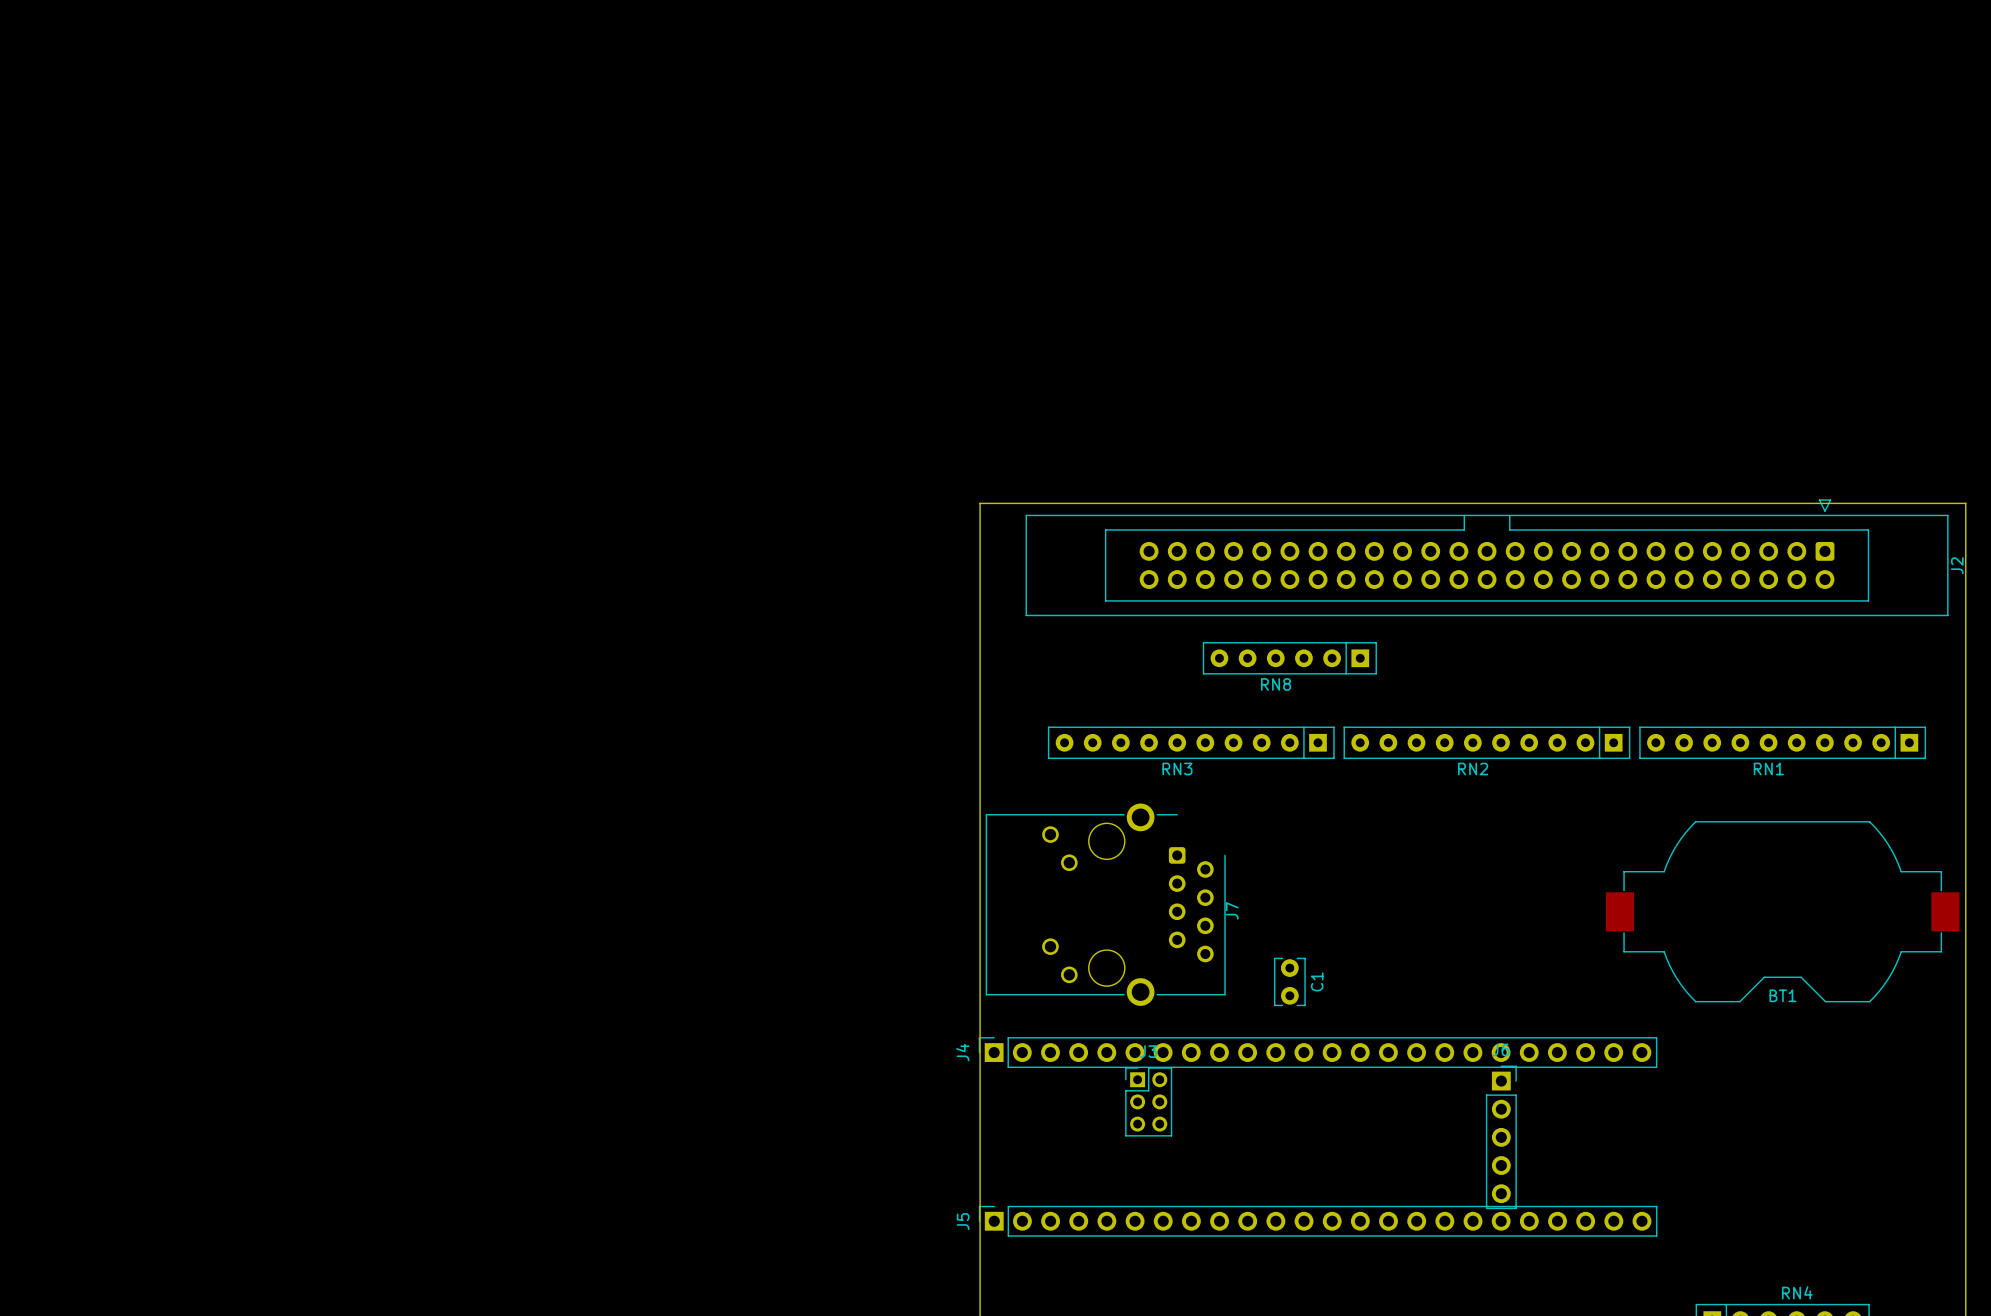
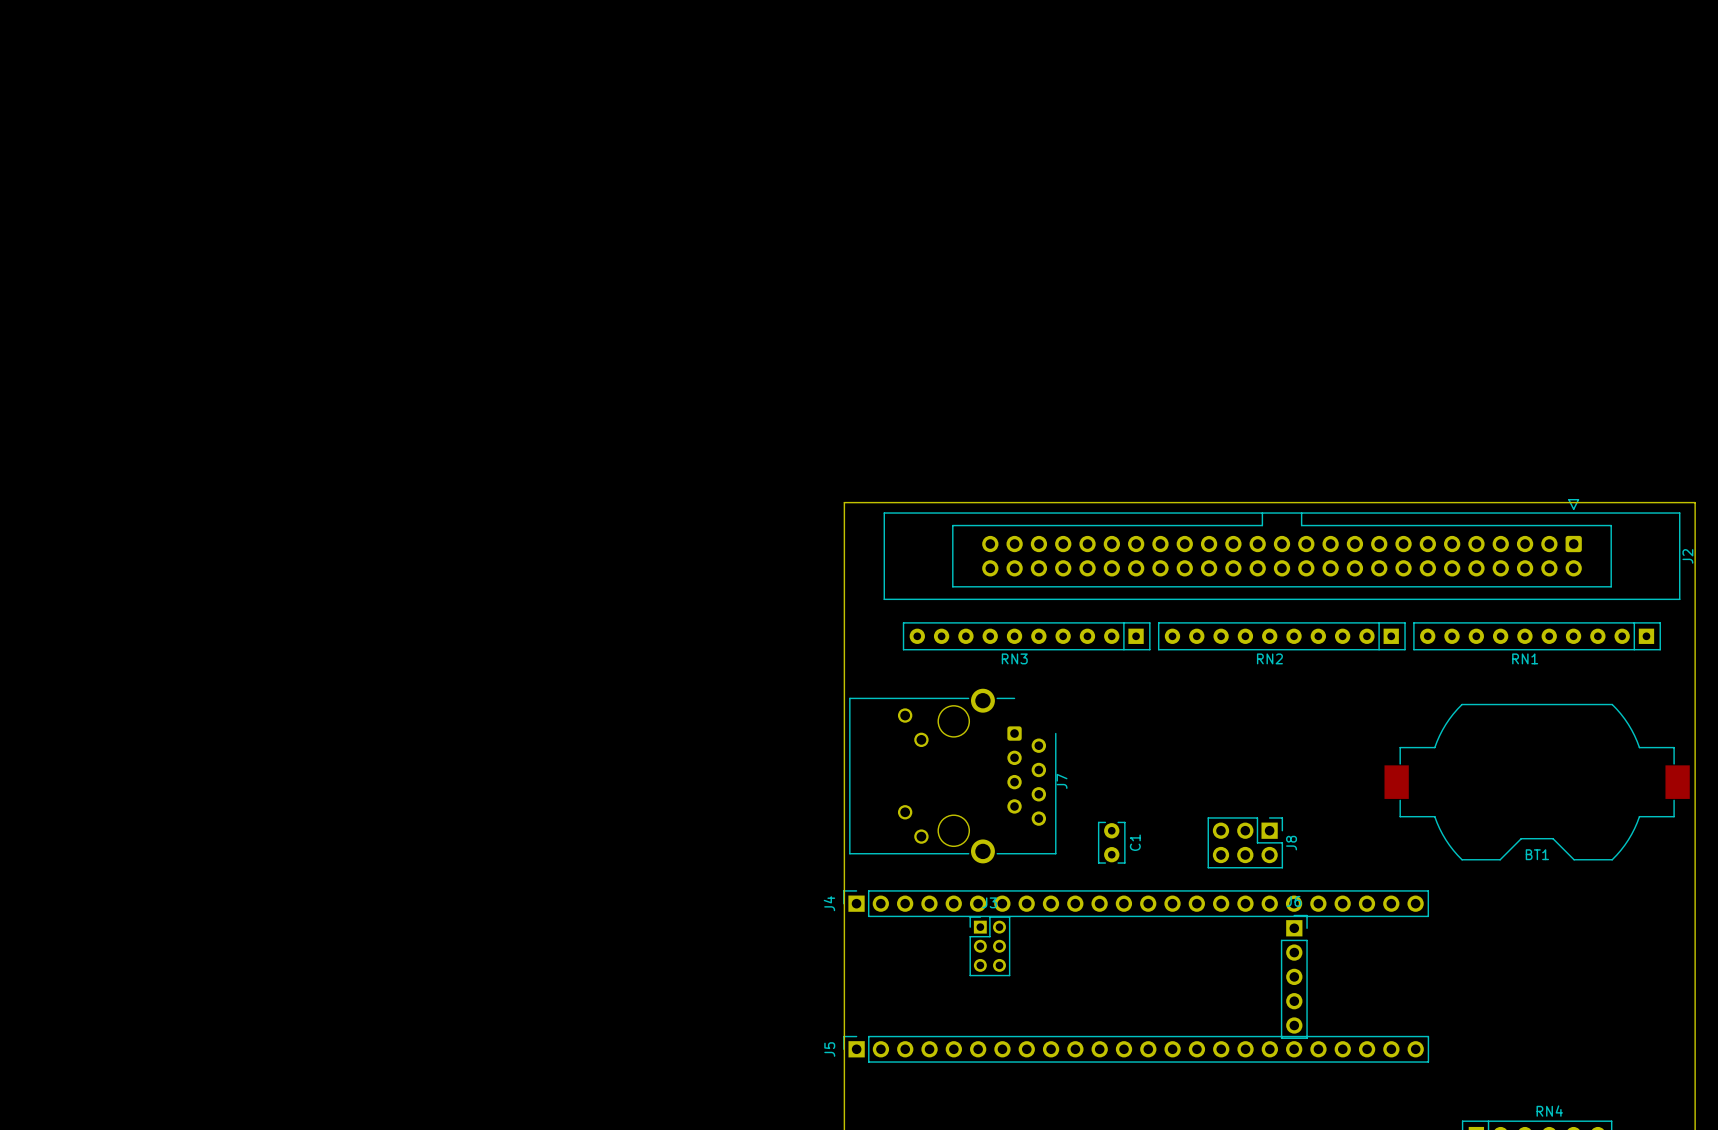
J2 position: (1487, 557) -> (1282, 549)
board edge: (980, 587) (980, 503) (1965, 503) (1965, 587) -> (844, 502) (1695, 502)
RN8: (1289, 658) -> none
J8: none -> (1245, 842)

